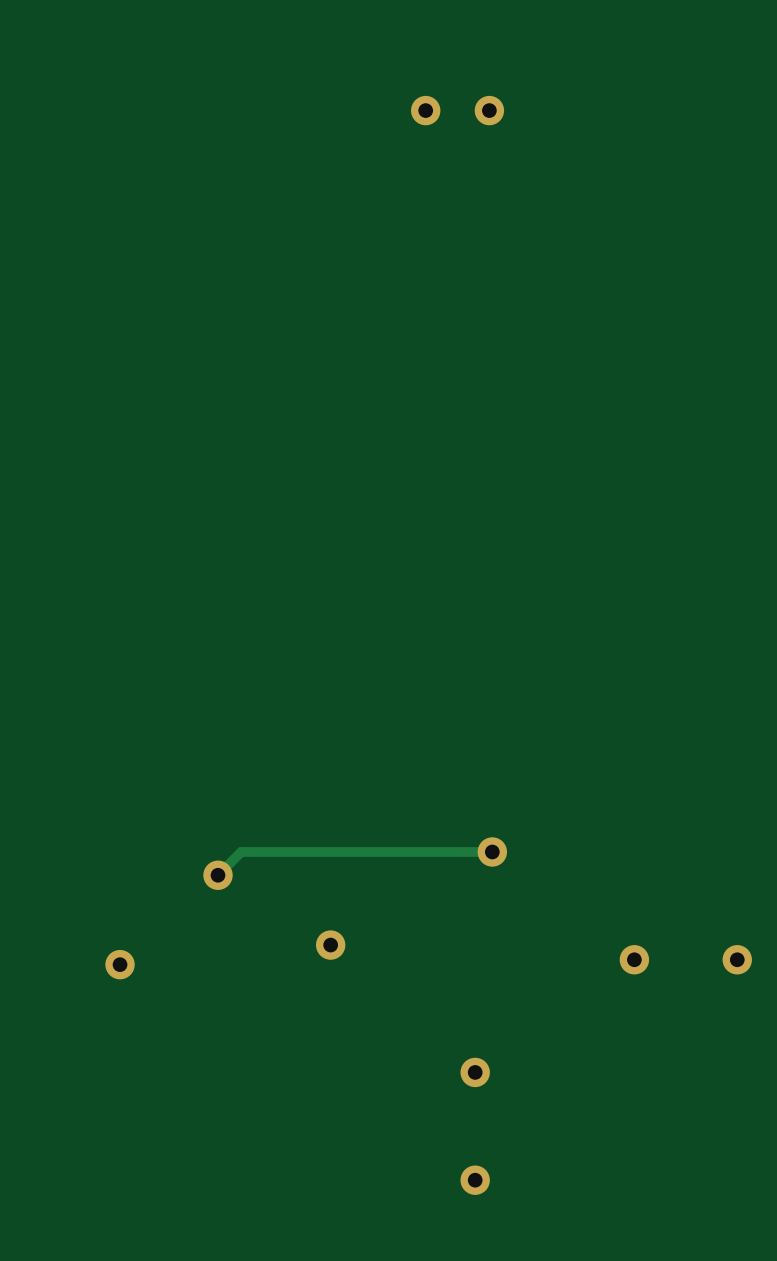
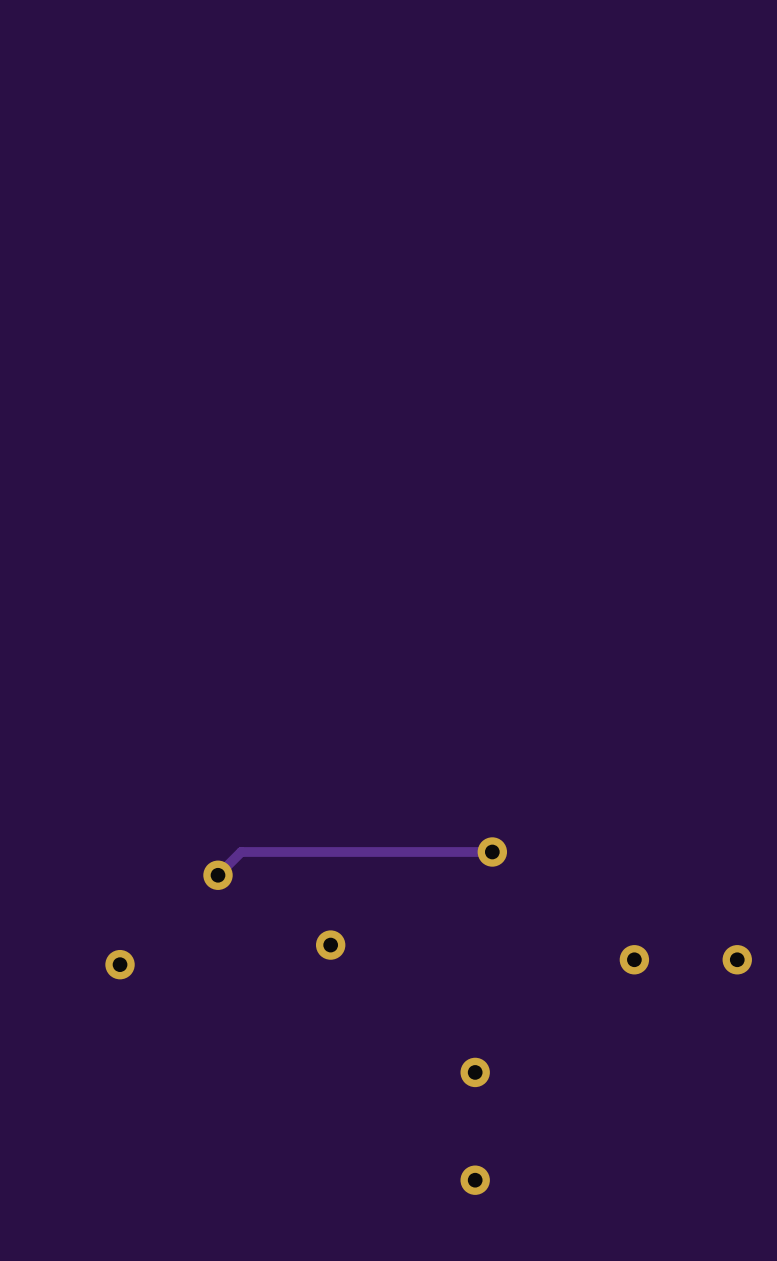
via: (425, 110) -> none
via: (489, 110) -> none

